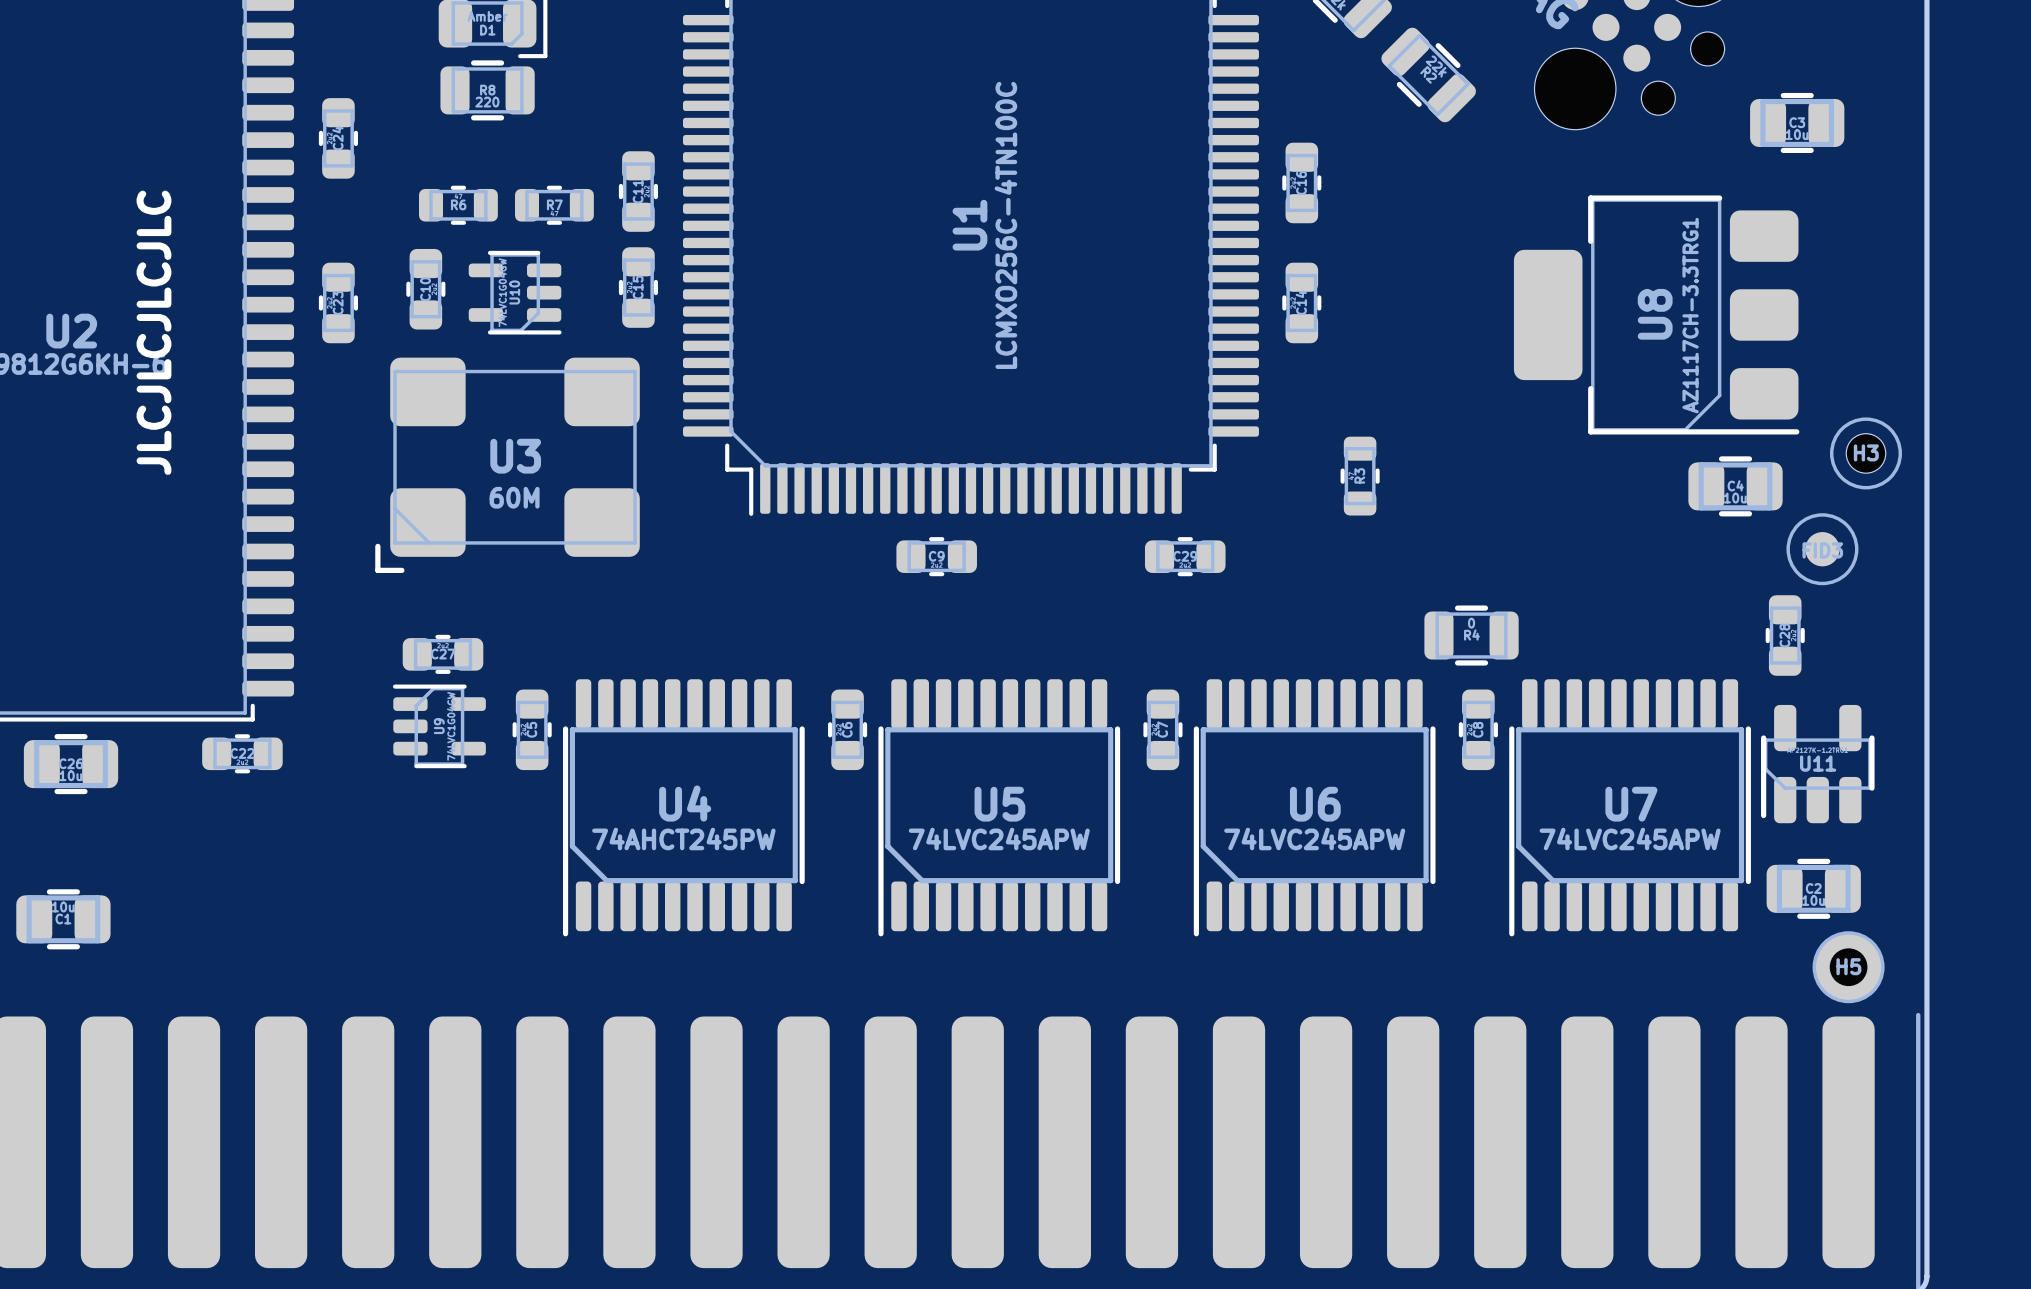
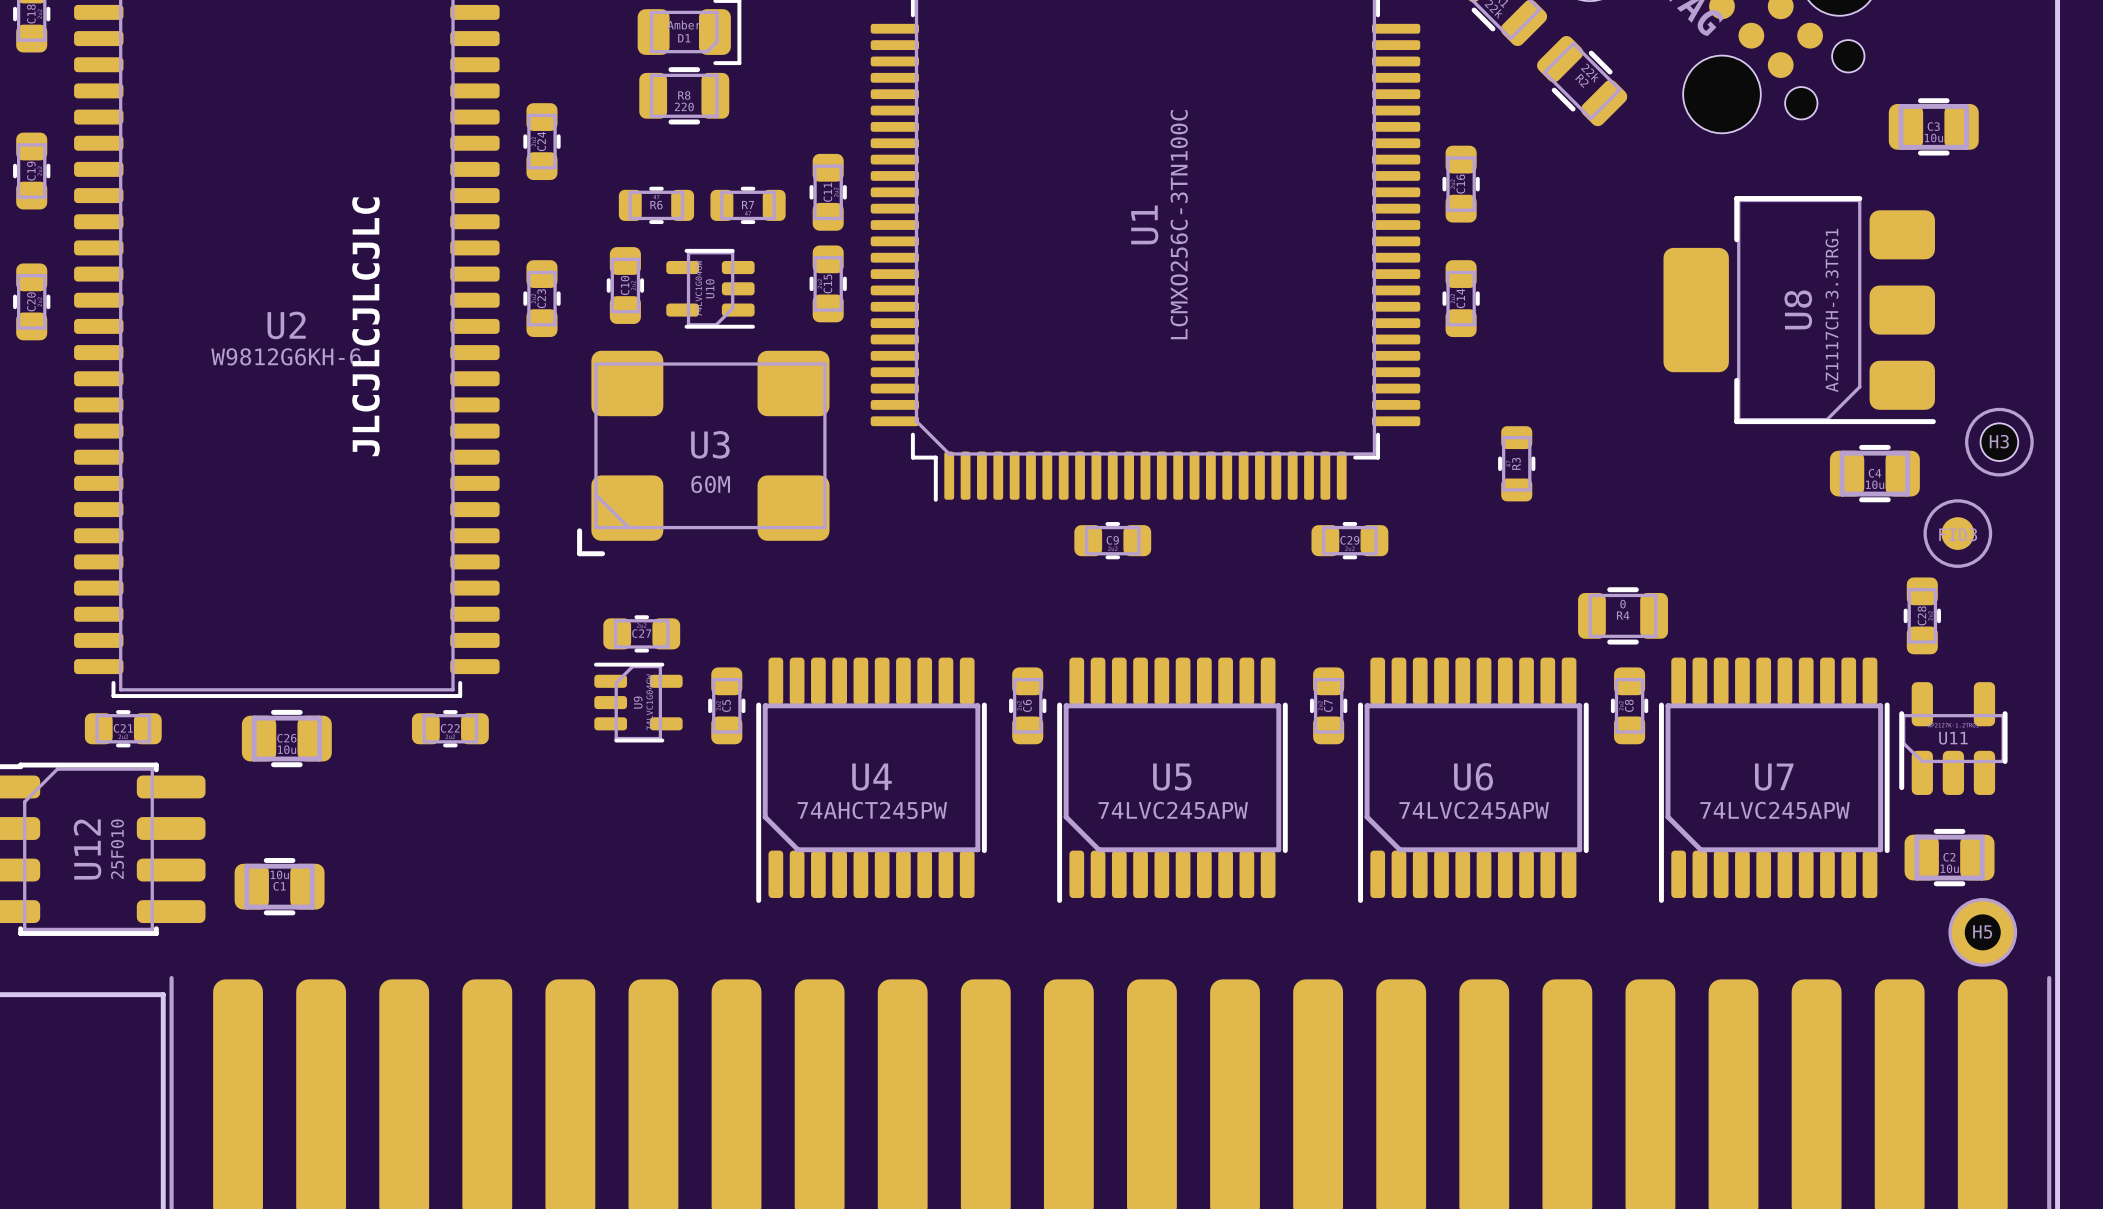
U1 value: LCMXO256C-4TN100C (1005, 225) -> LCMXO256C-3TN100C (1179, 224)

